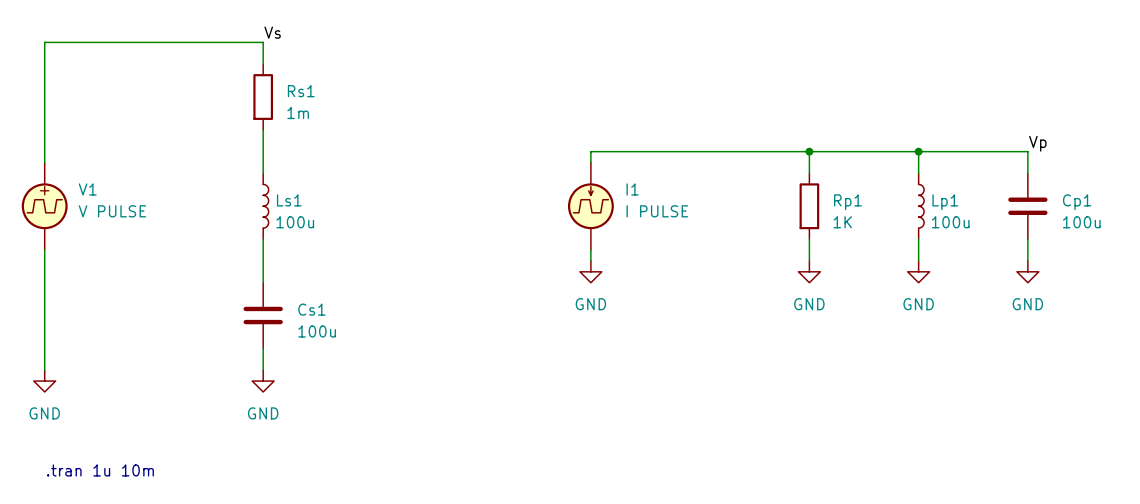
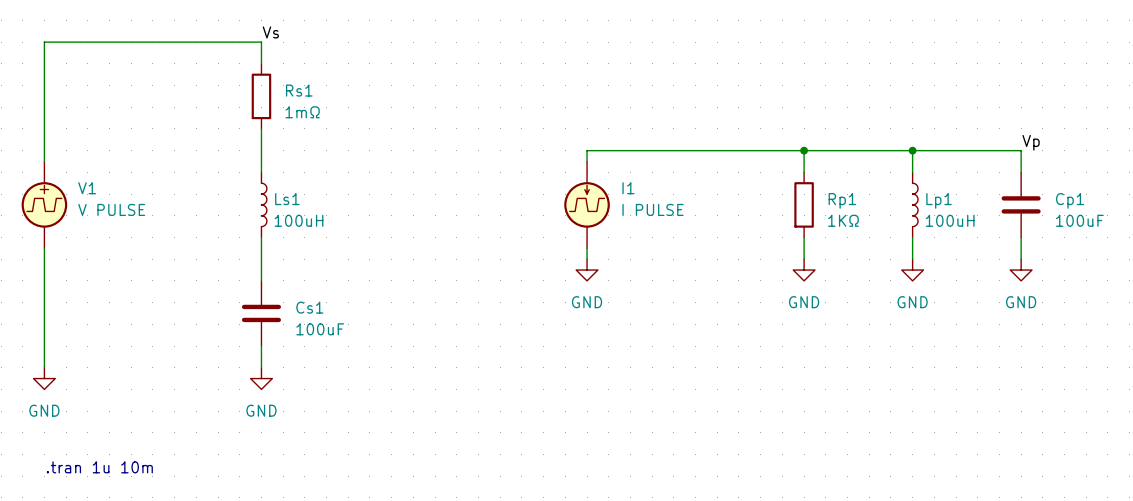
Rs1 value: 1m (298, 113) -> 1mΩ (302, 112)
Ls1 value: 100u (295, 222) -> 100uH (299, 220)
Rp1 value: 1K (842, 222) -> 1KΩ (843, 220)
Lp1 value: 100u (950, 222) -> 100uH (950, 220)
Cp1 value: 100u (1081, 222) -> 100uF (1079, 220)
Cs1 value: 100u (317, 331) -> 100uF (320, 329)

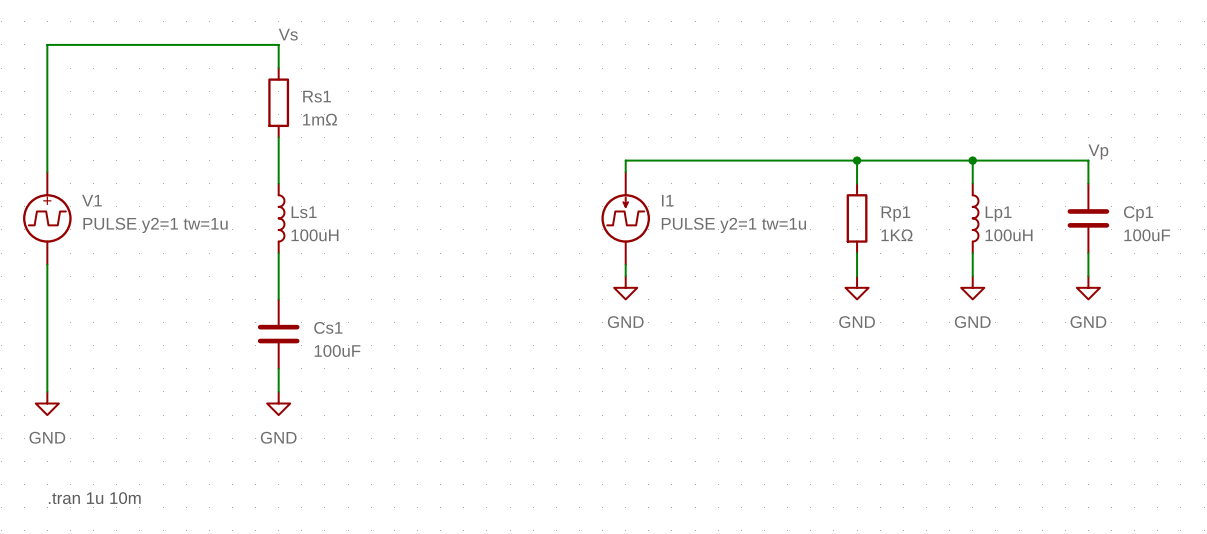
V1 value: V PULSE (111, 209) -> PULSE y2=1 tw=1u (155, 225)
I1 value: I PULSE (653, 209) -> PULSE y2=1 tw=1u (733, 225)

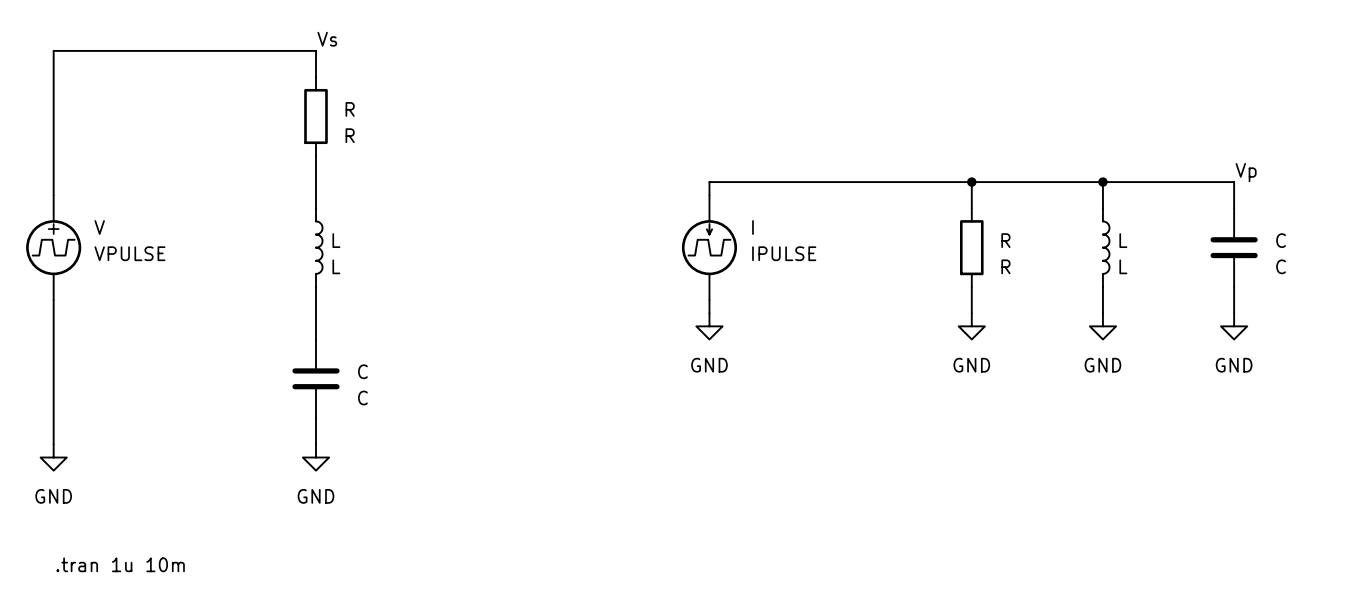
Rs1 name: Rs1 (317, 96) -> R (350, 109)
Rs1 value: 1mΩ (320, 119) -> R (350, 135)
V1 name: V1 (91, 200) -> V (99, 227)
I1 name: I1 (667, 200) -> I (752, 227)
Rp1 name: Rp1 (895, 213) -> R (1005, 240)
Cp1 name: Cp1 (1138, 213) -> C (1281, 240)
Ls1: 100uH (281, 218) -> none
L: none -> L (319, 247)
Lp1: 100uH (975, 218) -> none
L: none -> L (1106, 247)
V1 value: PULSE y2=1 tw=1u (155, 225) -> VPULSE (129, 253)
I1 value: PULSE y2=1 tw=1u (733, 225) -> IPULSE (784, 253)
Rp1 value: 1KΩ (897, 235) -> R (1005, 266)
Cp1 value: 100uF (1147, 235) -> C (1281, 266)
Cs1 name: Cs1 (328, 327) -> C (362, 371)
Cs1 value: 100uF (337, 351) -> C (362, 398)

